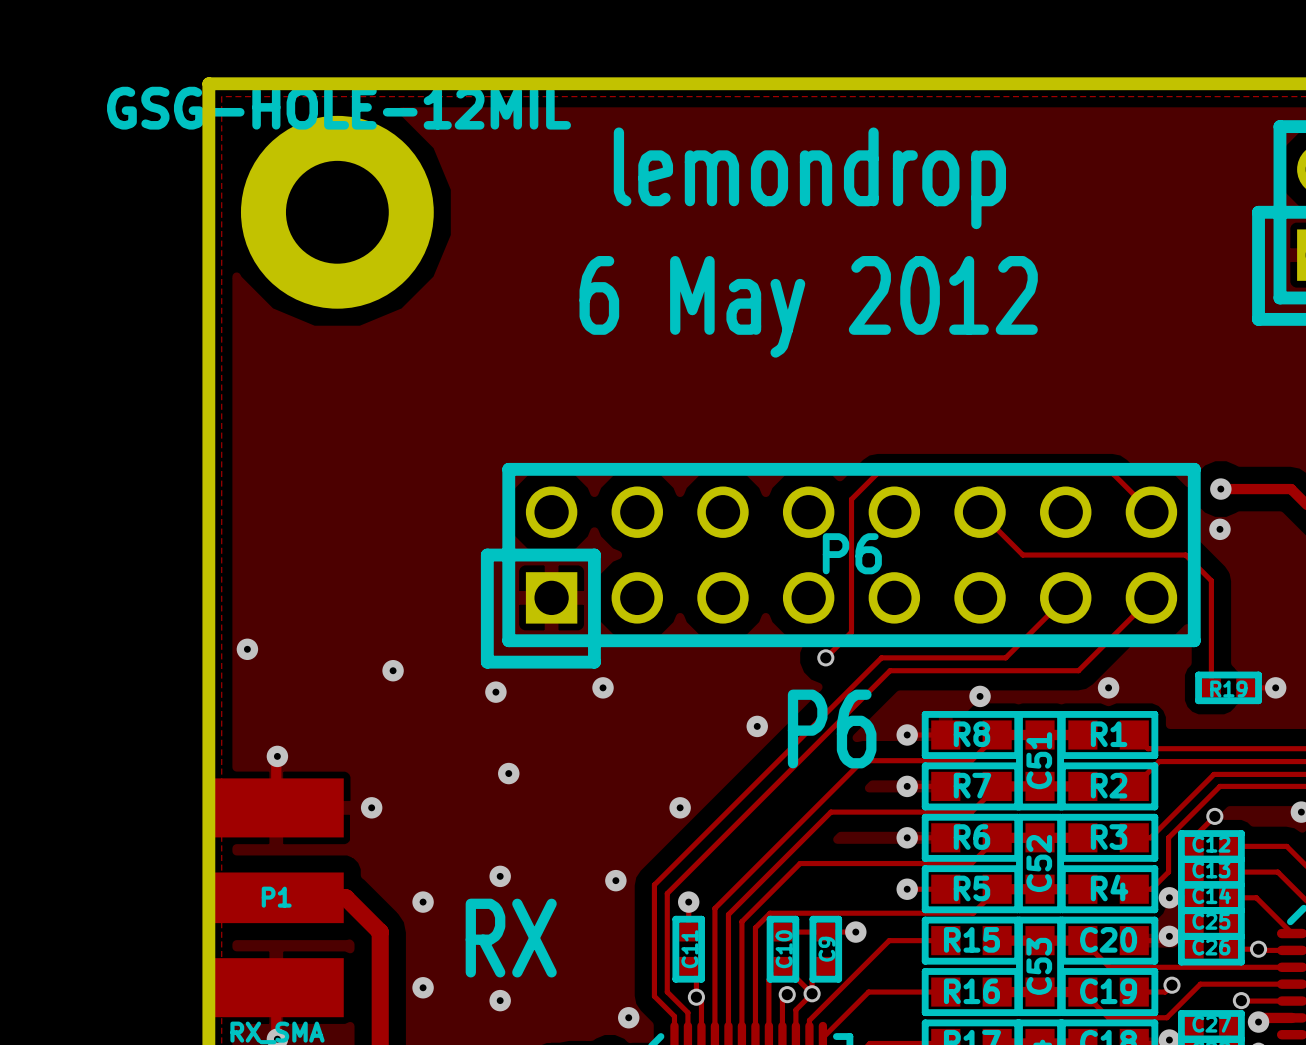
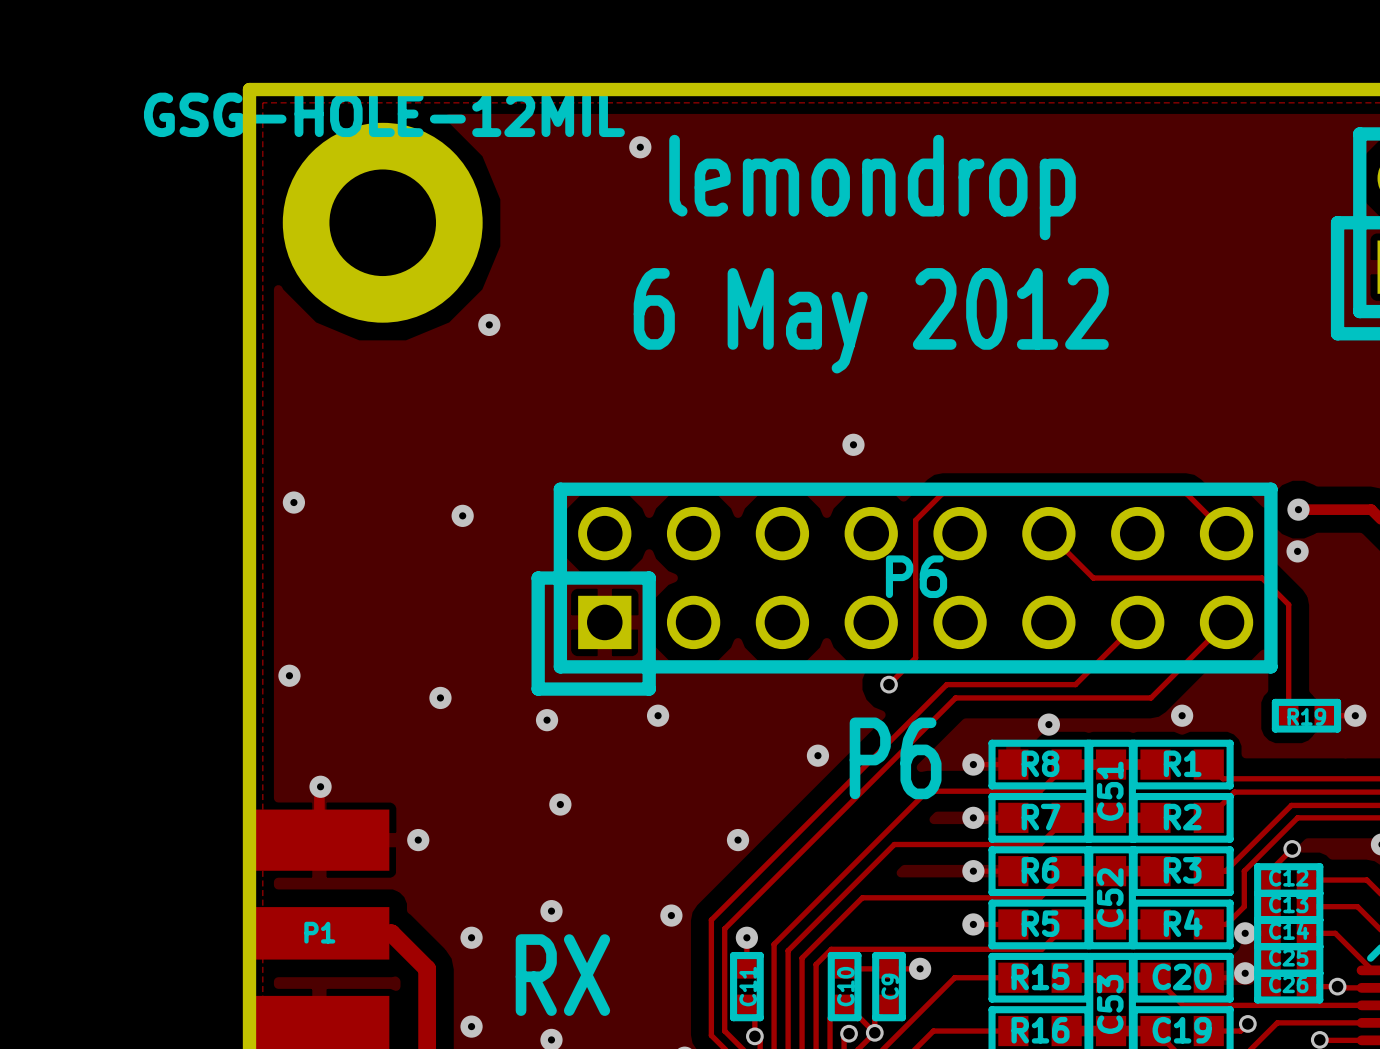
via: none -> (640, 147)
via: none -> (489, 324)
via: none -> (853, 444)
via: none -> (293, 502)
via: none -> (462, 515)

